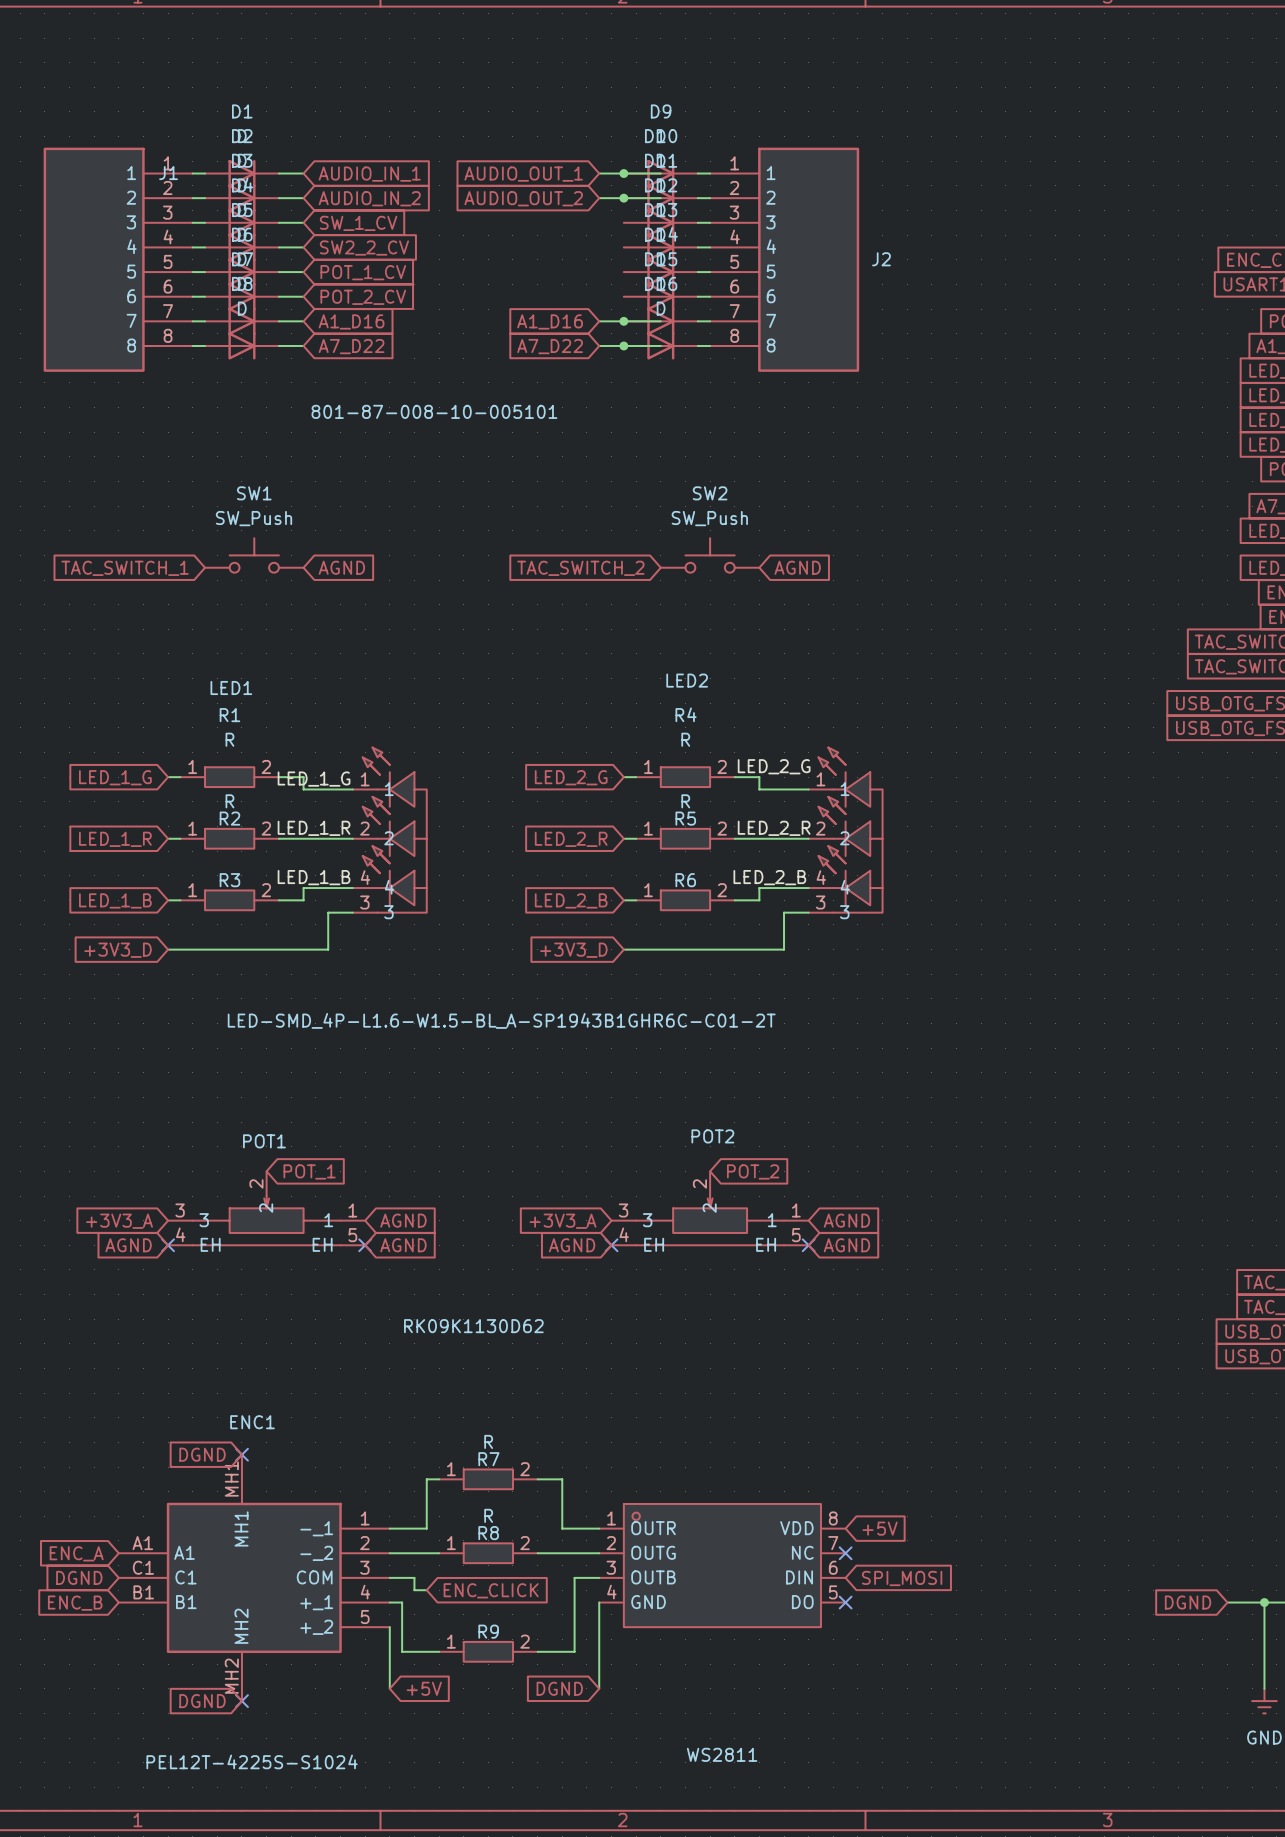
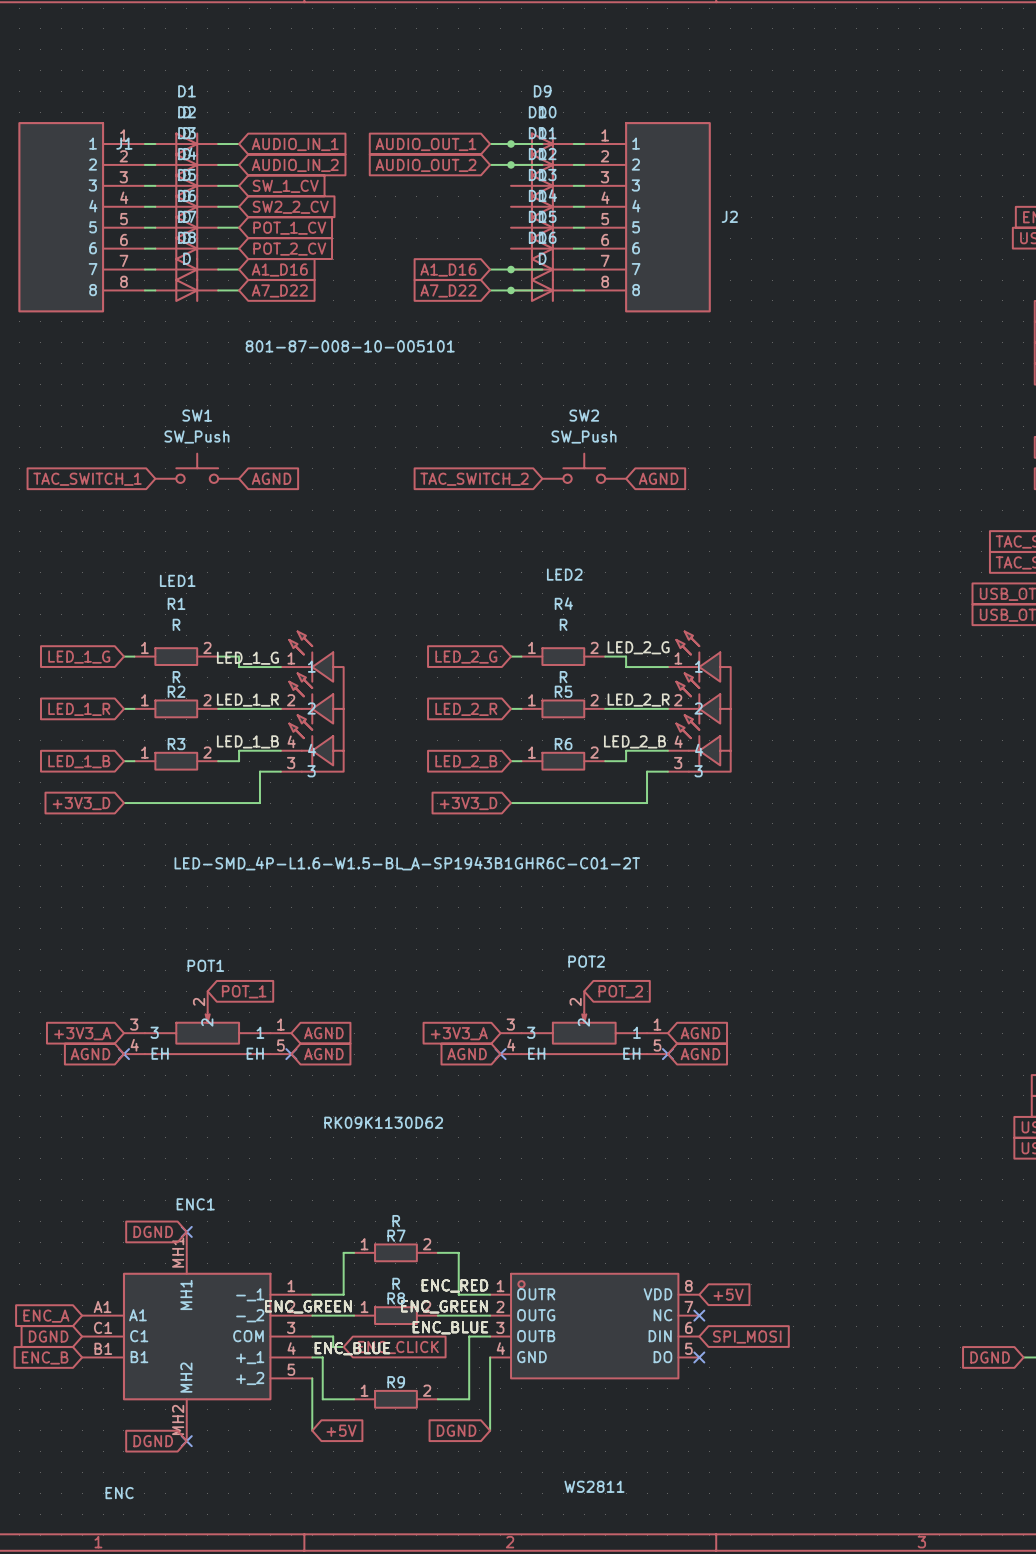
label: none -> ENC_RED (454, 1285)
label: none -> ENC_GREEN (308, 1306)
label: none -> ENC_GREEN (444, 1306)
label: none -> ENC_BLUE (450, 1327)
label: none -> ENC_BLUE (352, 1348)
ENC1 value: PEL12T-4225S-S1024 (252, 1761) -> ENC (119, 1493)

